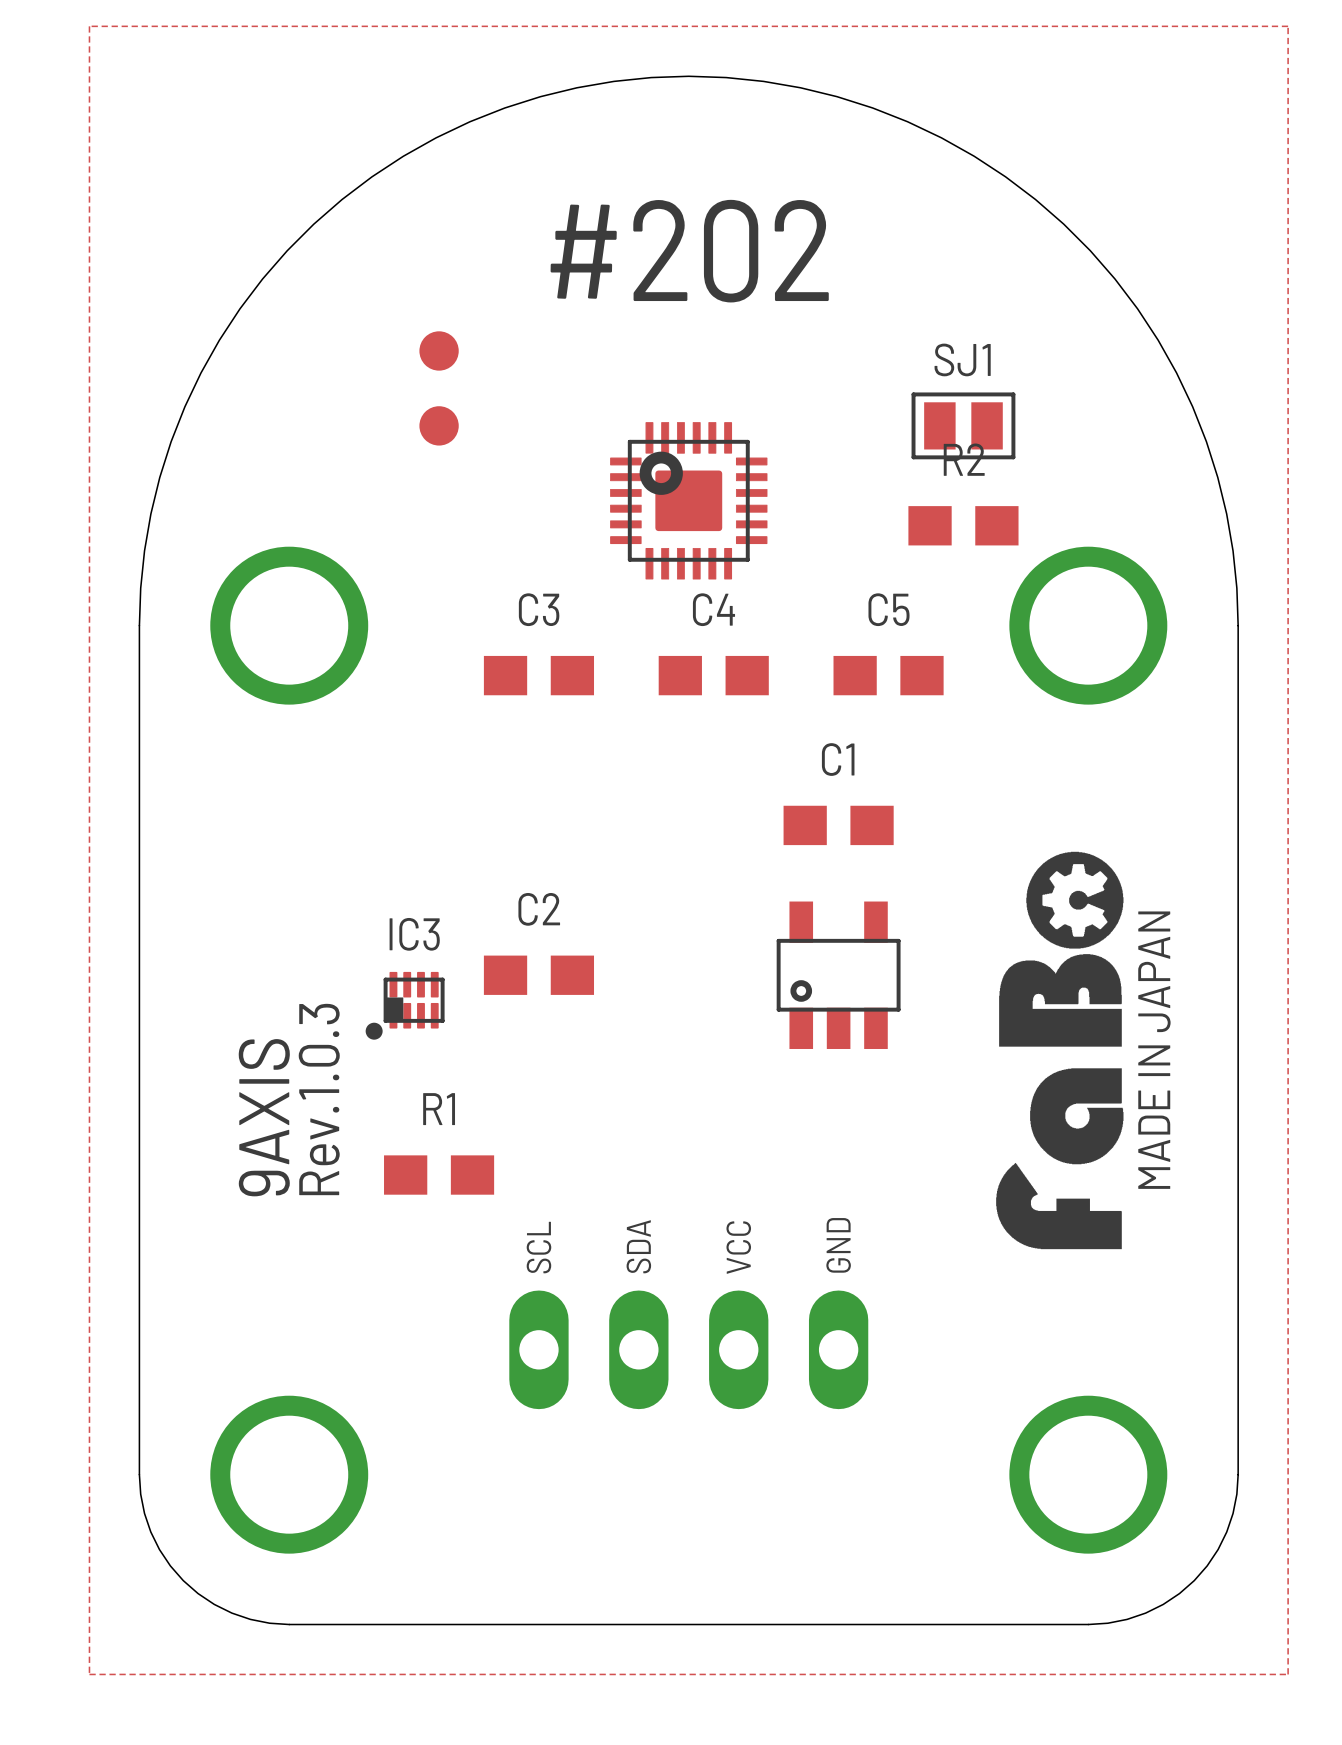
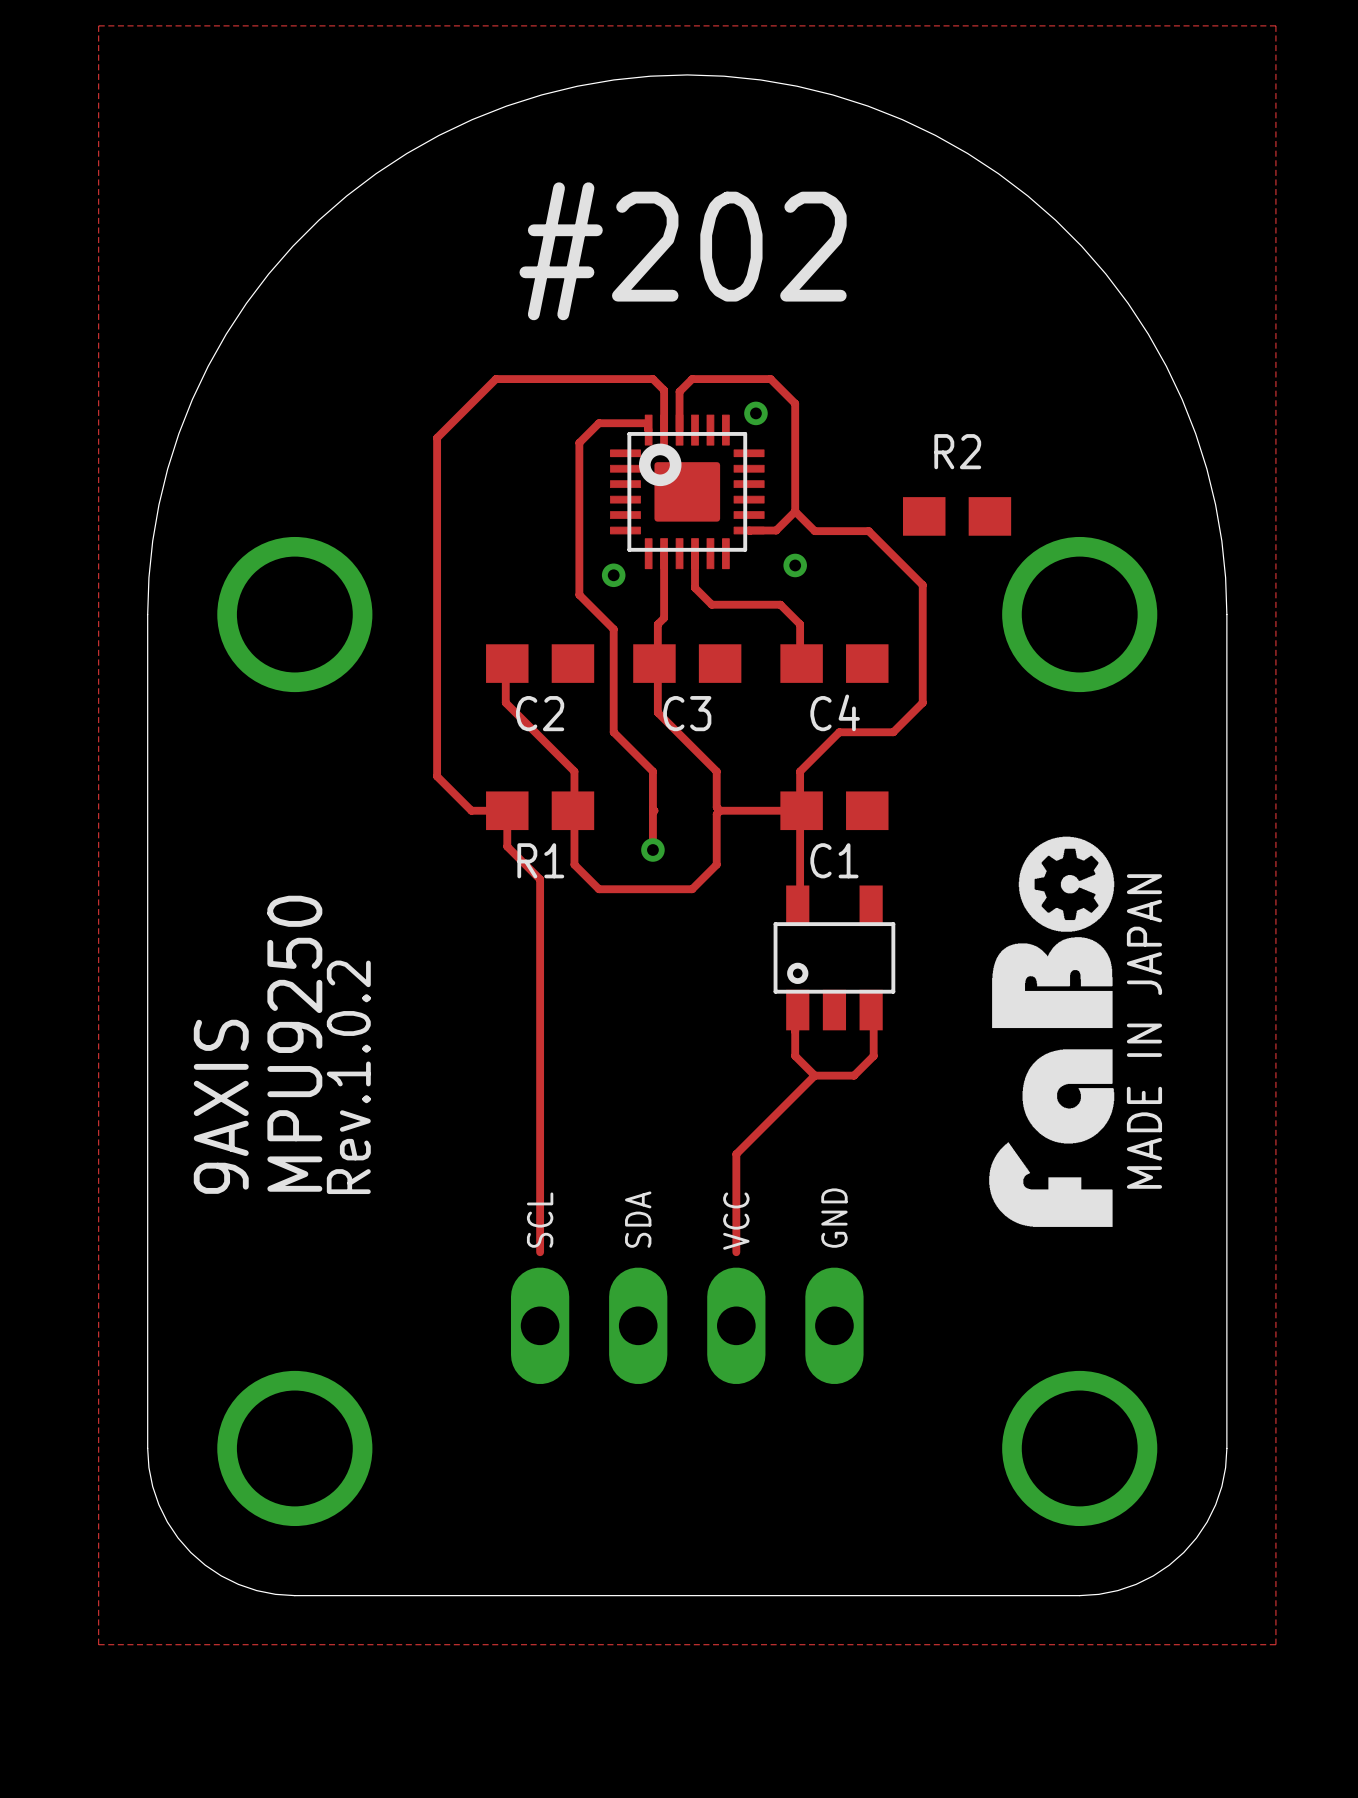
part: (439, 350) -> none
via: none -> (755, 413)
part: (439, 425) -> none
SJ1: (963, 425) -> none
track: none -> (648, 430) (648, 423) (598, 423) (579, 442) (579, 594) (613, 629) (613, 732) (652, 771) (654, 810) (652, 849)
track: none -> (664, 430) (664, 390) (652, 379) (495, 379) (437, 437) (437, 776) (471, 810) (507, 810) (507, 846) (540, 879) (540, 1252)
track: none -> (679, 430) (679, 391) (692, 379) (770, 379) (795, 403) (795, 511)
track: none -> (795, 511) (776, 530) (749, 531)
track: none -> (795, 511) (814, 531) (868, 531) (922, 585) (922, 702) (893, 732) (839, 732) (800, 771) (801, 797) (800, 903) (797, 905)
track: none -> (664, 553) (664, 618) (657, 624) (657, 660) (654, 663) (654, 674) (657, 678) (657, 712) (716, 771) (716, 807) (720, 810)
track: none -> (695, 553) (695, 587) (711, 604) (780, 604) (800, 624) (801, 663)
via: none -> (795, 565)
via: none -> (613, 575)
C3 name: C3 (539, 609) -> C2 (540, 713)
C4 name position: C4 (713, 609) -> C4 (835, 712)
track: none -> (507, 663) (505, 702) (574, 771) (574, 864) (598, 889) (692, 889) (716, 864) (716, 814) (720, 810)
C3: none -> (687, 663)
C4 position: (713, 675) -> (834, 663)
C5: (888, 675) -> none
C1 name position: C1 (838, 759) -> C1 (834, 860)
track: none -> (720, 810) (801, 810)
via: none -> (652, 849)
C2: (538, 975) -> none
IC3: (405, 1005) -> none
track: none -> (797, 1010) (795, 1056) (814, 1075)
track: none -> (871, 1010) (873, 1012) (873, 1056) (854, 1075) (814, 1075)
text: none -> MPU9250 (294, 1043)
track: none -> (814, 1075) (736, 1154) (736, 1252)
text: Rev.1.0.3 (319, 1099) -> Rev.1.0.2 (348, 1077)
R1 name position: R1 (439, 1109) -> R1 (540, 860)
text position: 9AXIS (264, 1117) -> 9AXIS (221, 1106)
R1 position: (439, 1175) -> (540, 810)

